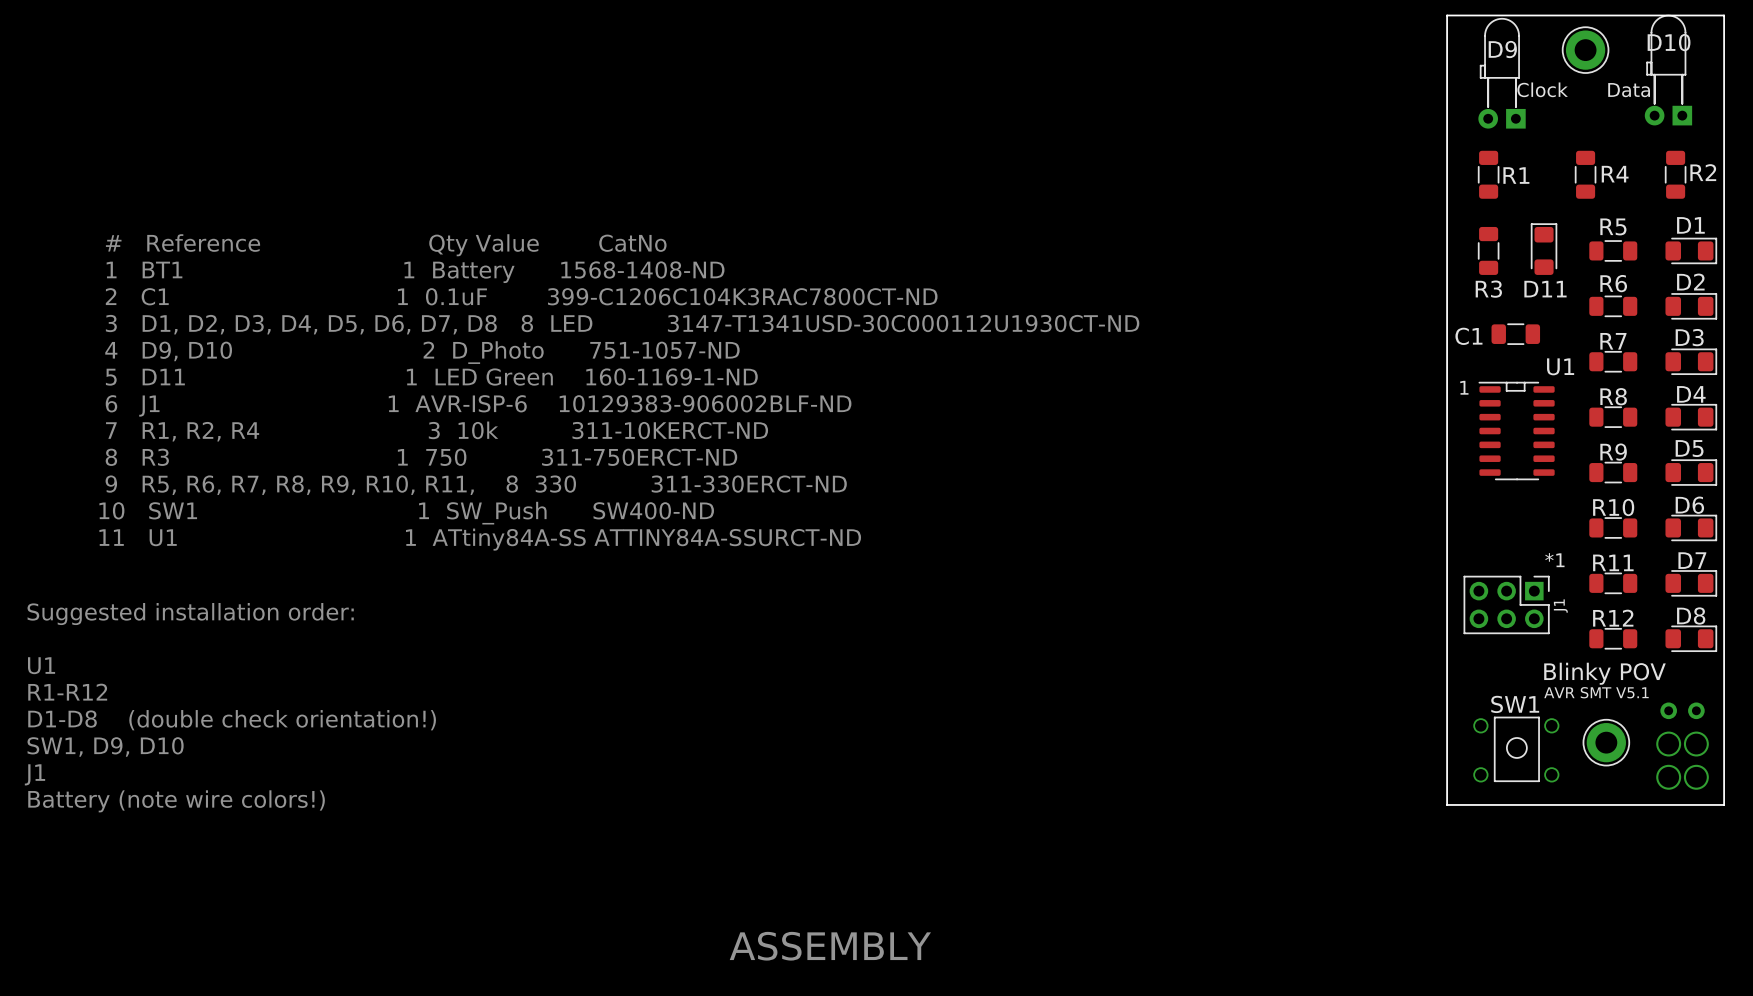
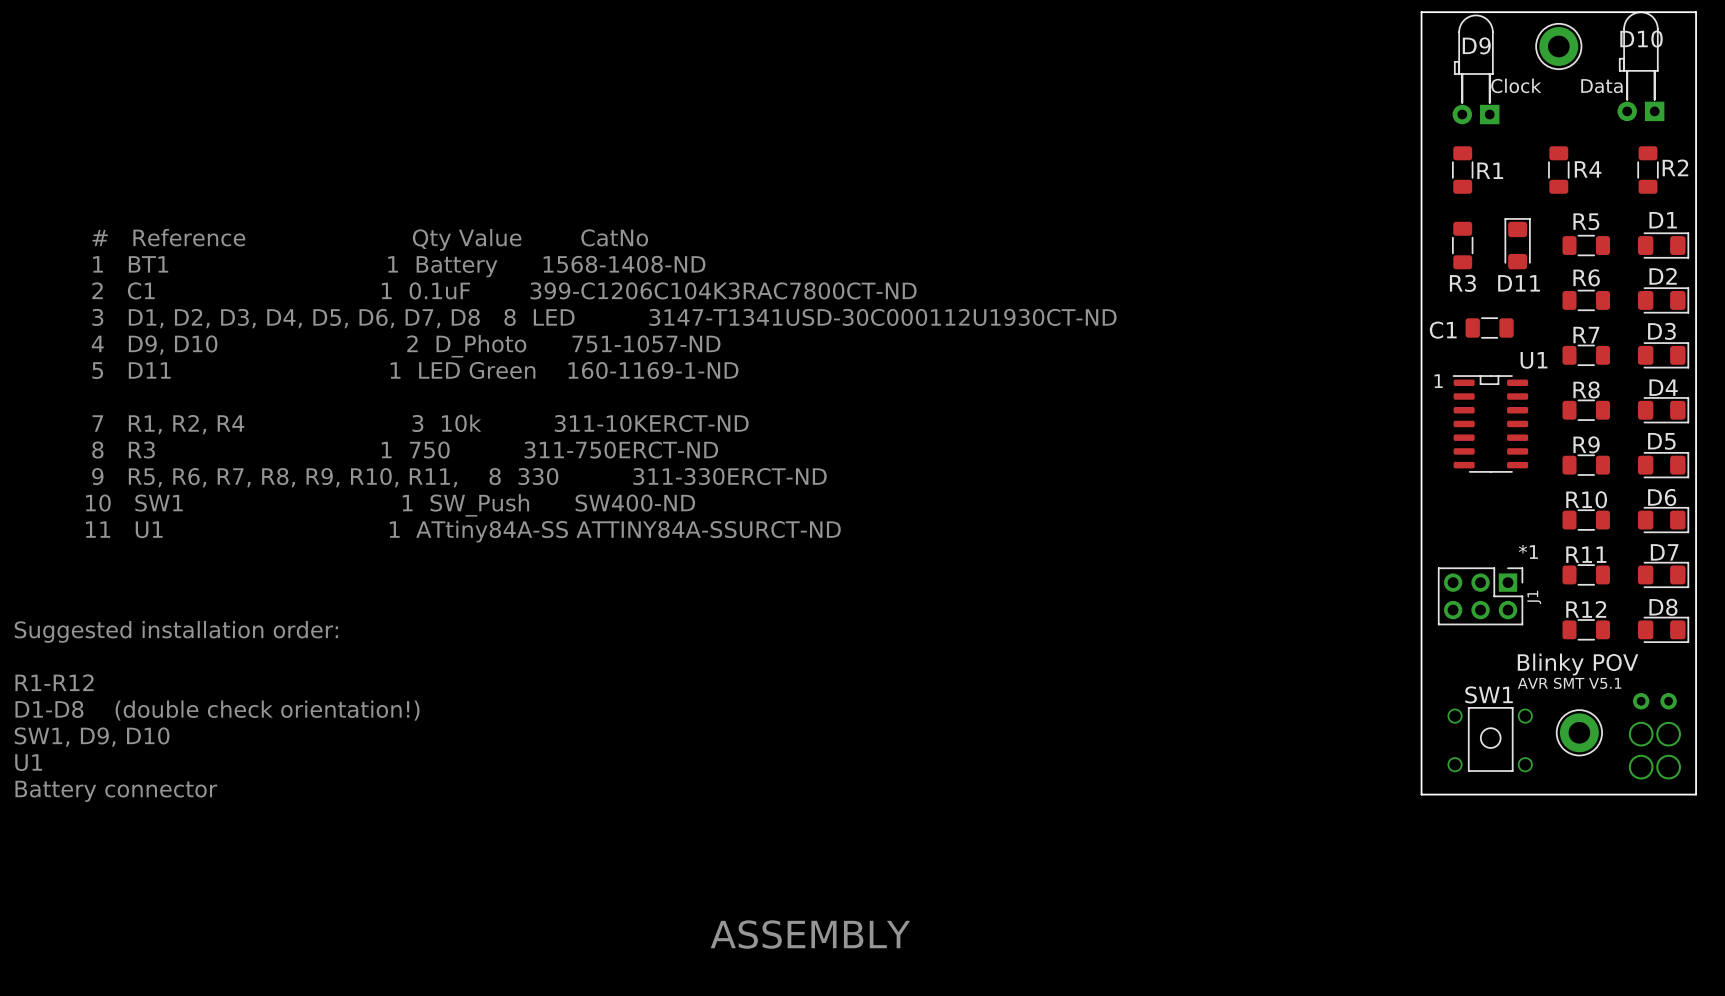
text: 6 J1 1 AVR-ISP-6 10129383-906002BLF-ND (478, 405) -> none
text position: Suggested installation order: (190, 614) -> Suggested installation order: (176, 631)
text: U1 (41, 665) -> none
text: J1 (34, 774) -> U1 (28, 762)
text: Battery (note wire colors!) (176, 801) -> Battery connector (116, 791)

